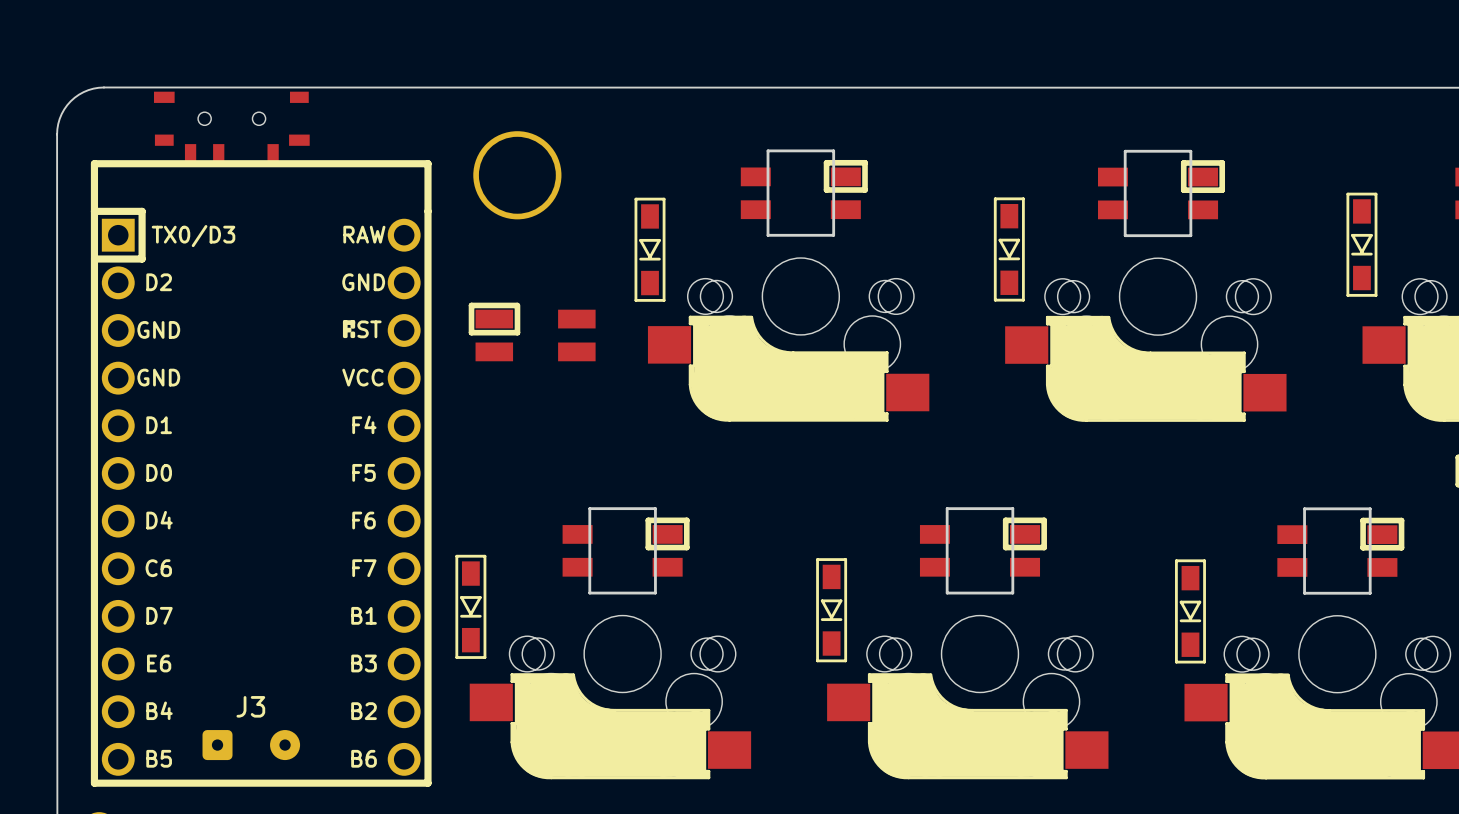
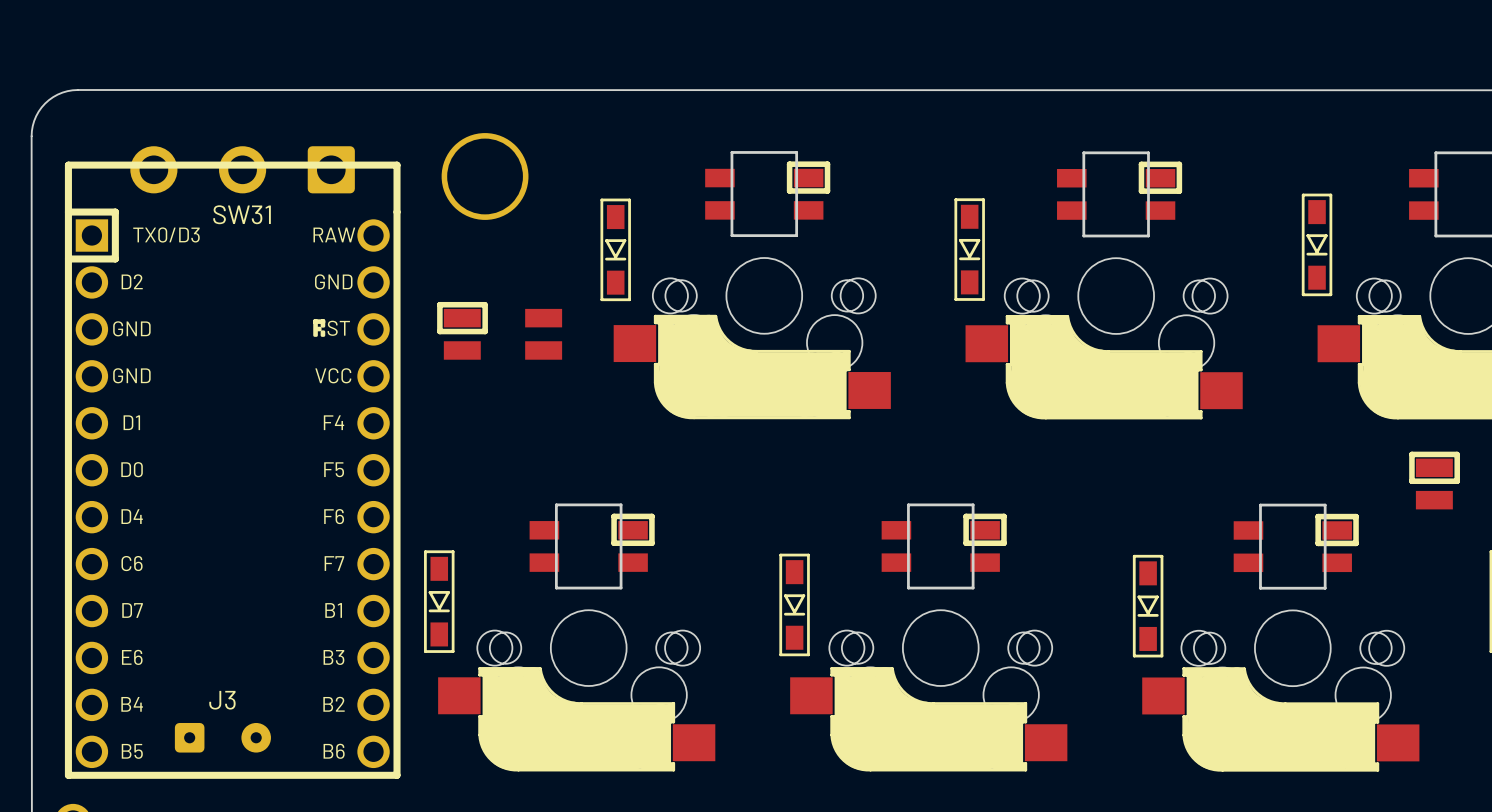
part: (231, 127) -> none
SW31: none -> (242, 169)

